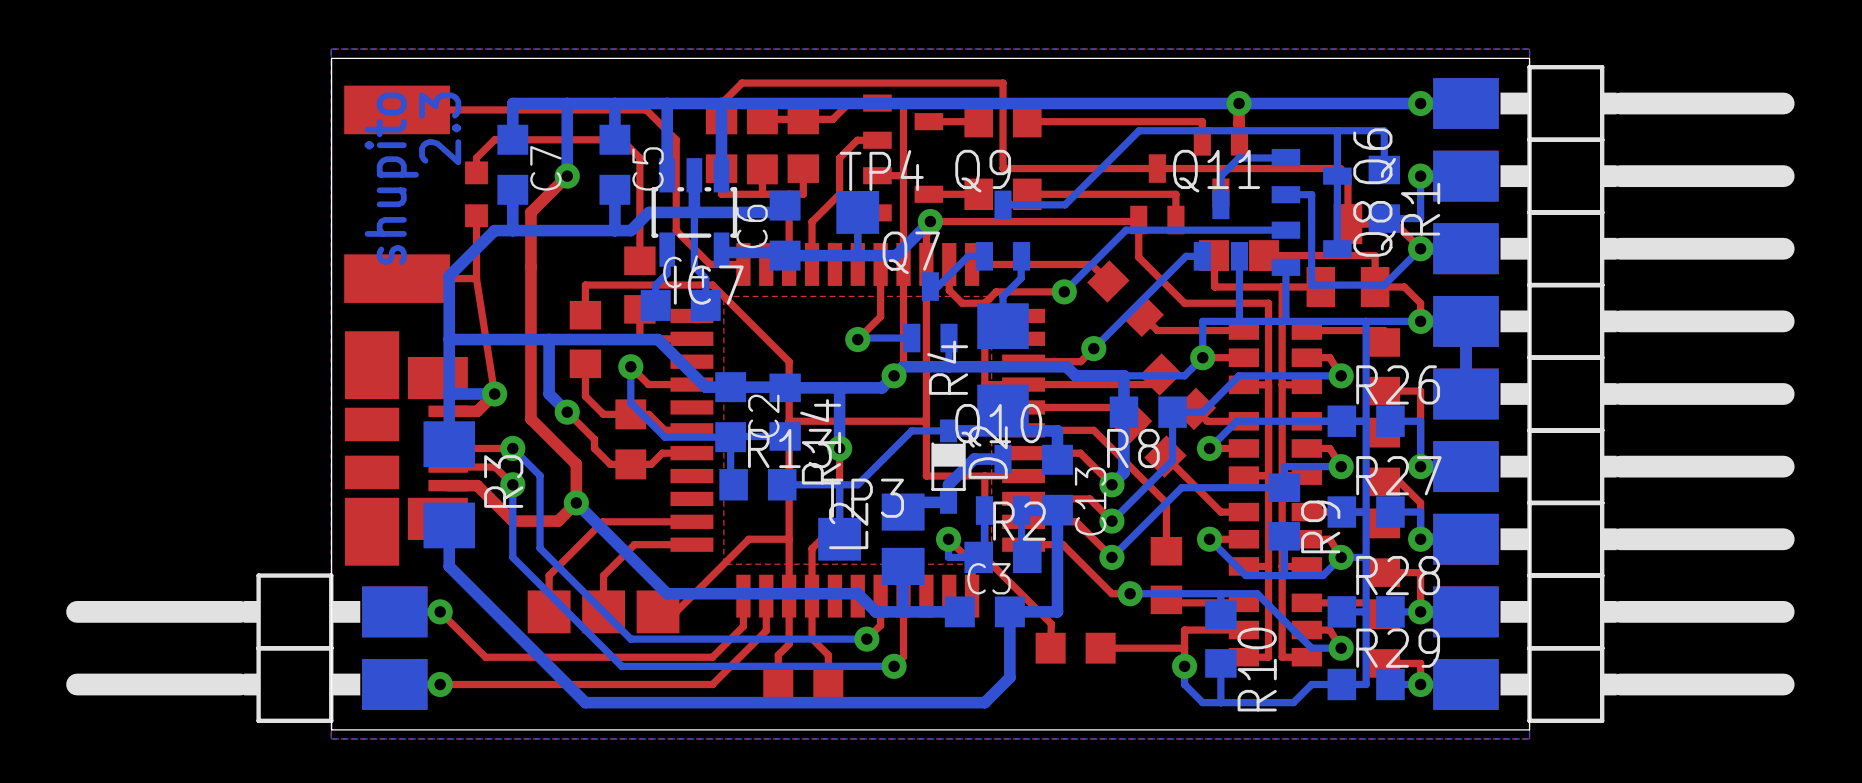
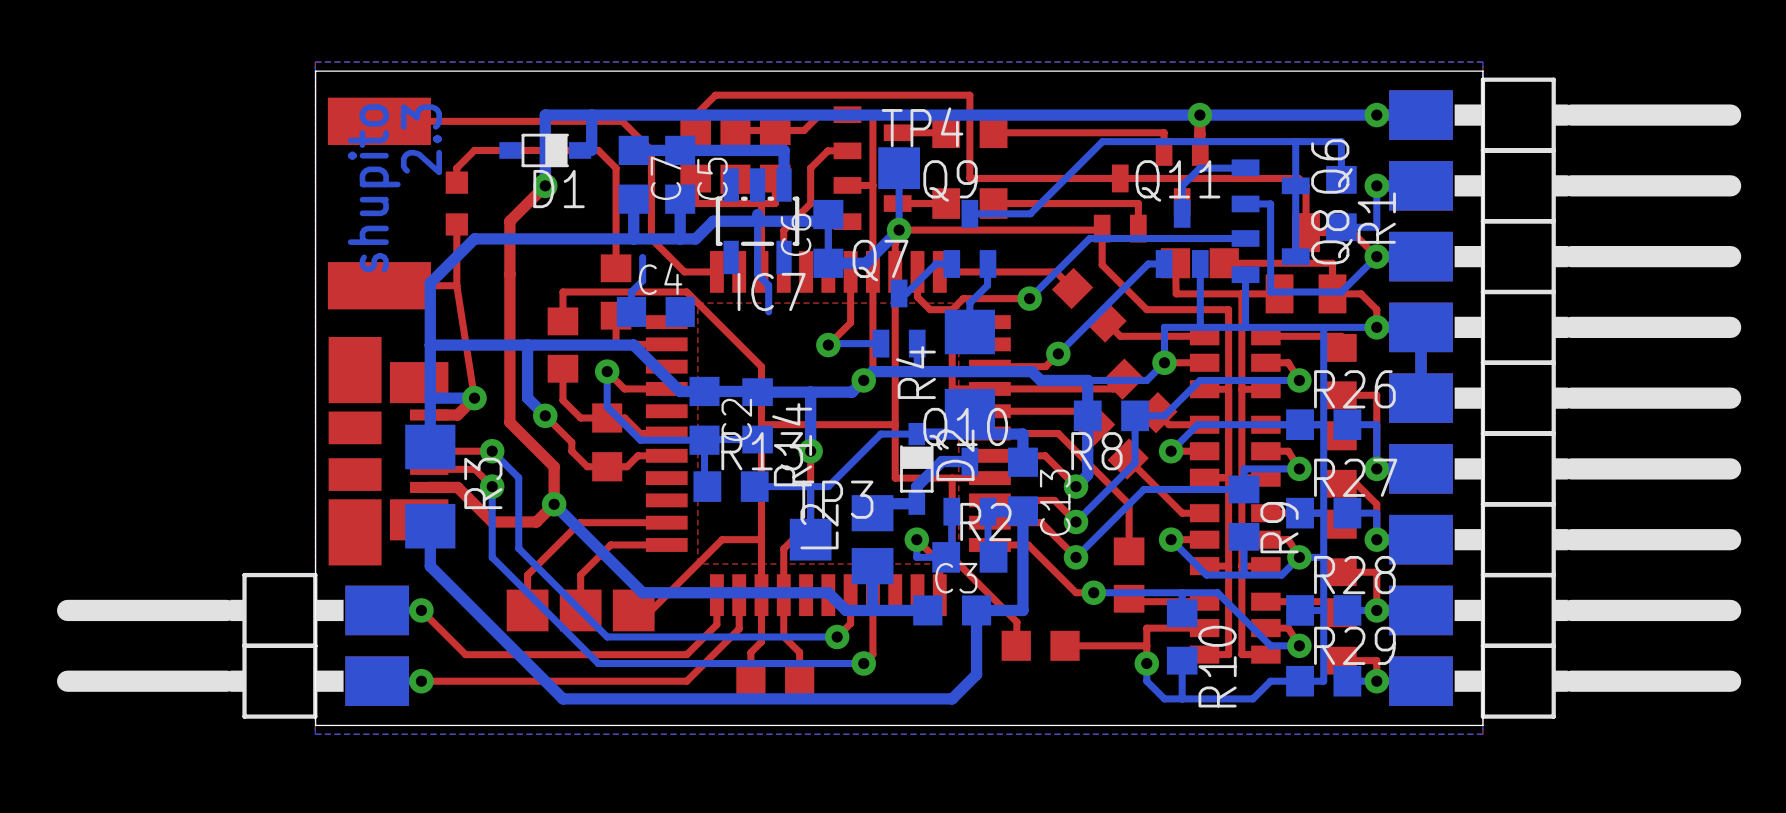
bottom track: (567, 103) (512, 103) (512, 139) -> none
bottom track: (667, 103) (667, 175) -> none
bottom track: (721, 103) (721, 175) -> none
D1: none -> (545, 150)
bottom track: none -> (633, 150) (784, 150) (784, 185)
bottom track: none -> (899, 168) (899, 230)
C7 position: (512, 164) -> (633, 174)
C5 position: (614, 164) -> (680, 174)
bottom track: (694, 175) (694, 266) (705, 278) (705, 305) -> none
bottom track: (512, 189) (512, 230) -> (680, 199) (680, 238)
bottom track: (614, 189) (614, 230) -> (633, 199) (633, 238)
IC7 position: (694, 212) -> (757, 221)
bottom track: (739, 212) (648, 212) (630, 230) -> (713, 221) (695, 238) (607, 238)
TP4 position: (857, 212) -> (899, 168)
C6 position: (785, 230) -> (828, 238)
bottom track: (721, 249) (721, 252) (785, 252) -> (828, 214) (828, 221) (757, 221) (757, 260)
bottom track: (857, 255) (785, 255) -> (768, 311) (768, 285) (757, 274) (757, 263)

